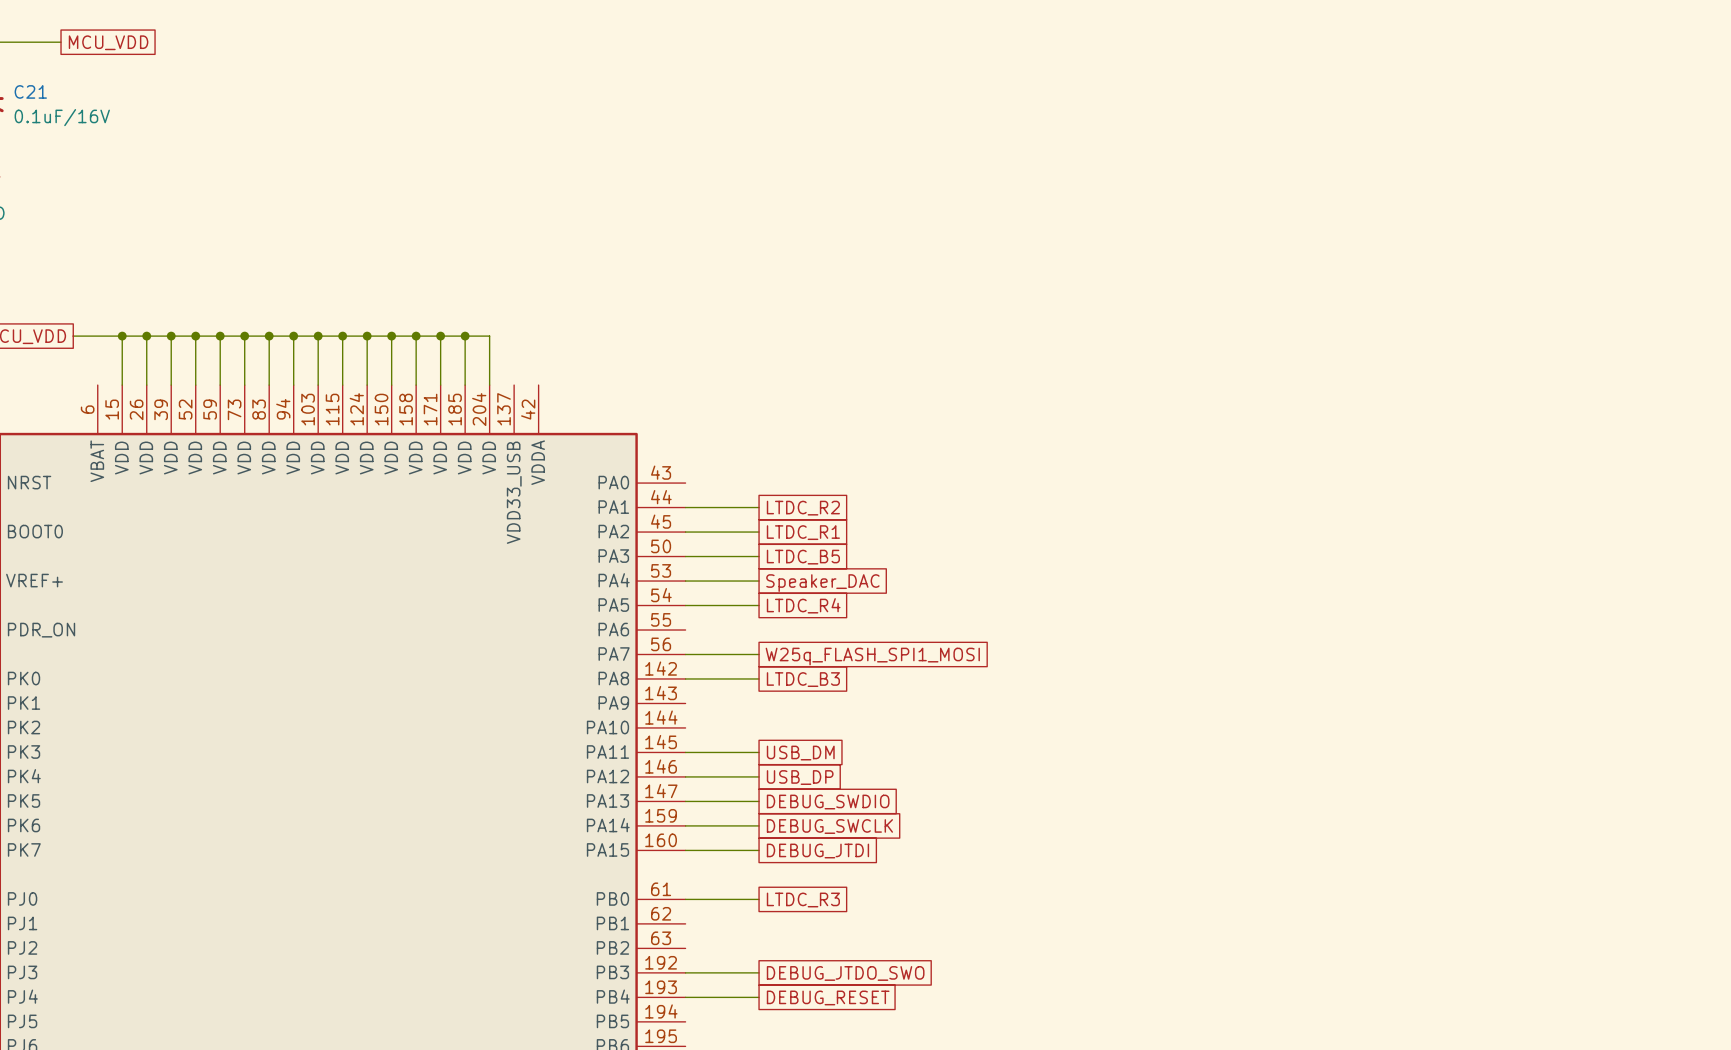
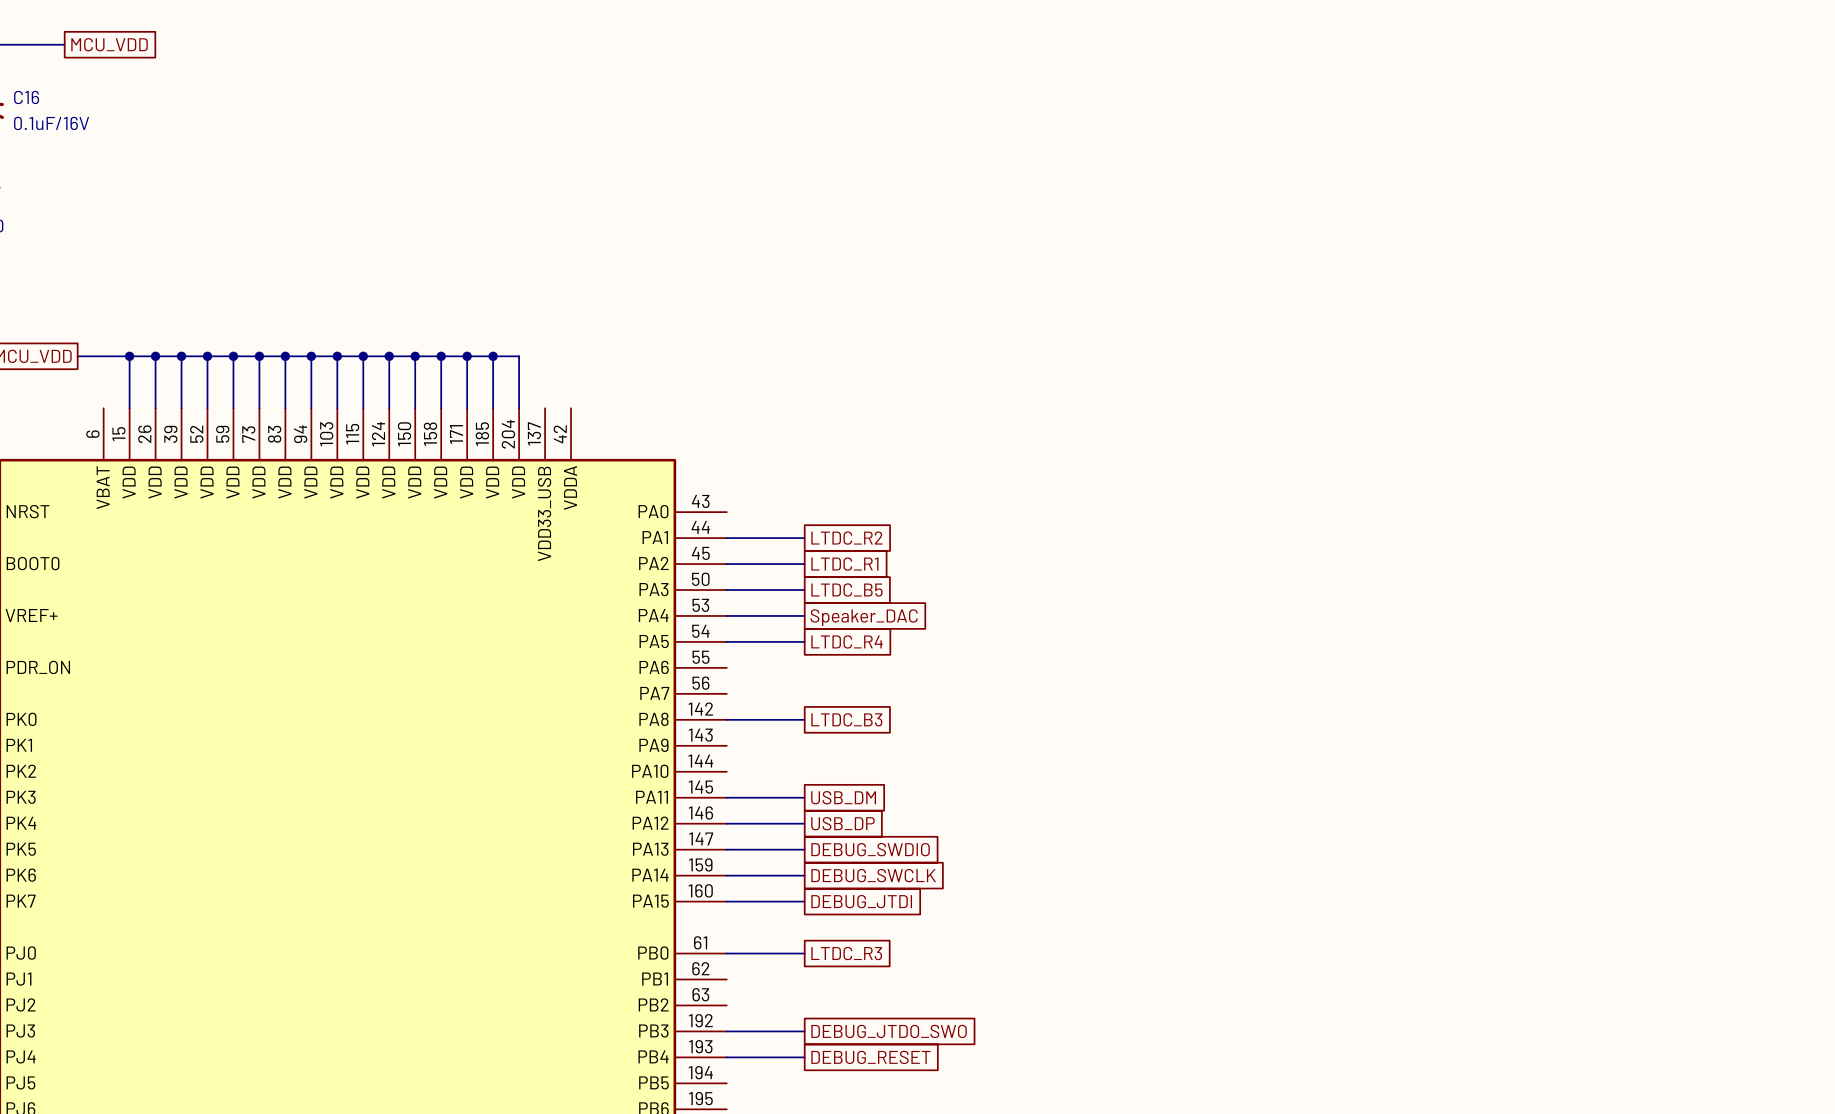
C21 name: C21 (30, 91) -> C16 (26, 97)
wire: (685, 654) (759, 654) -> none
global label: W25q_FLASH_SPI1_MOSI (872, 656) -> none

